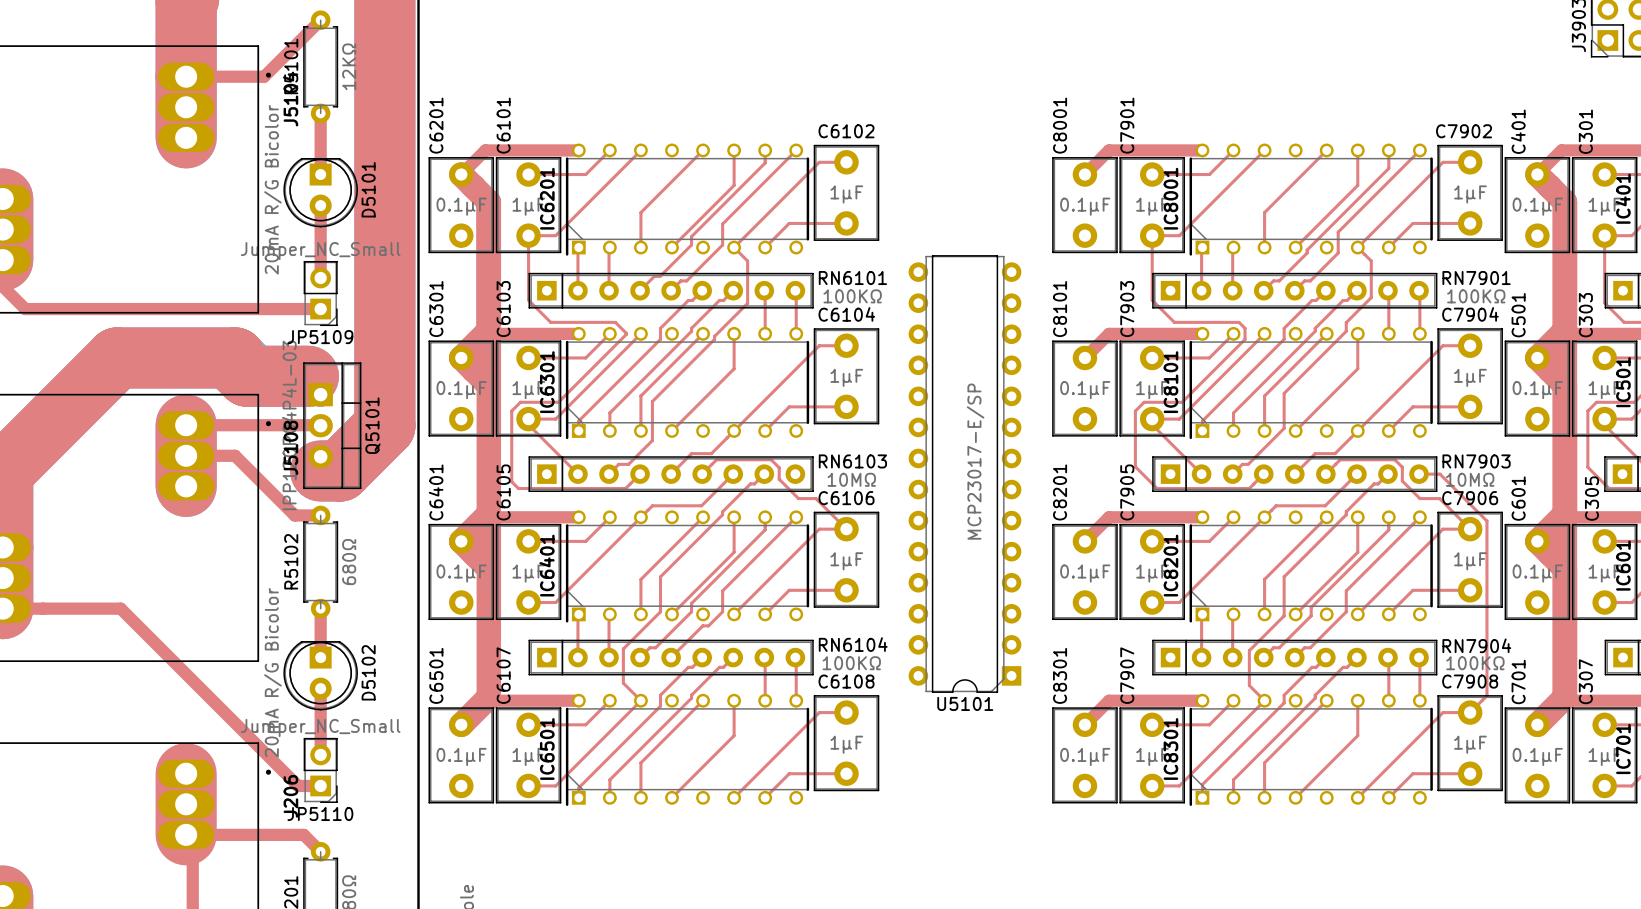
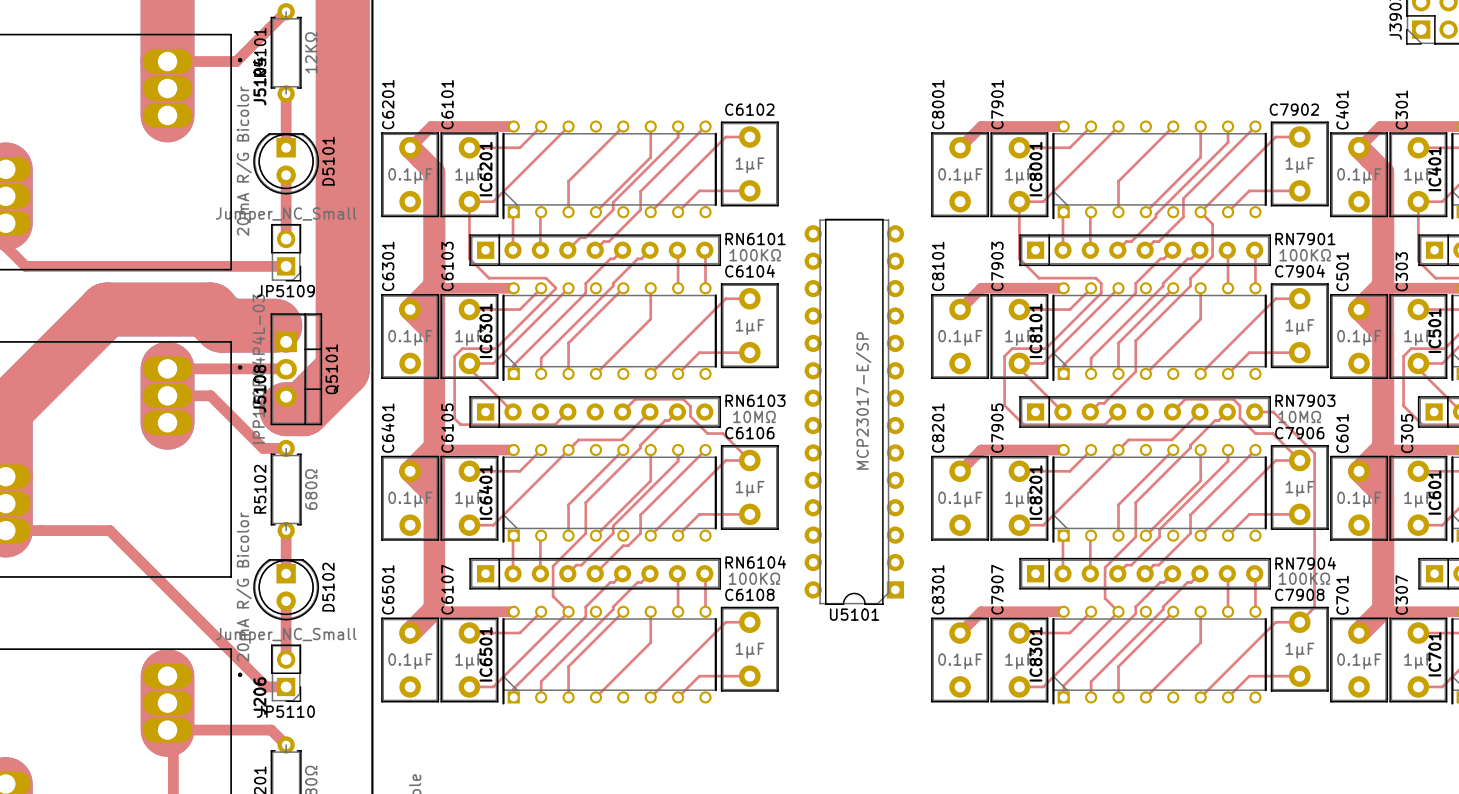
top track: (734, 247) (747, 261) (747, 303) (652, 401) (652, 440) (628, 464) (618, 464) (609, 474) -> none
top track: (734, 430) (711, 453) (691, 453) (671, 474) -> none
top track: (1357, 430) (1335, 453) (1315, 453) (1294, 474) -> none

